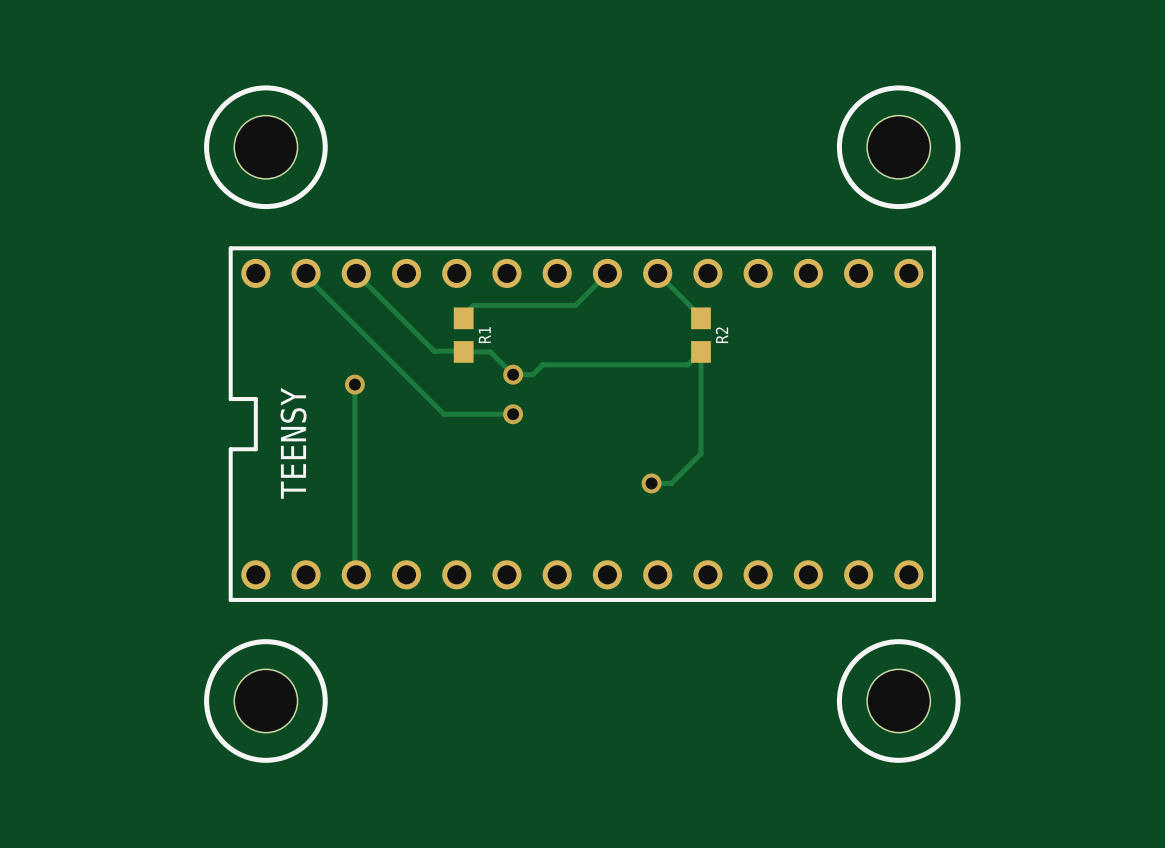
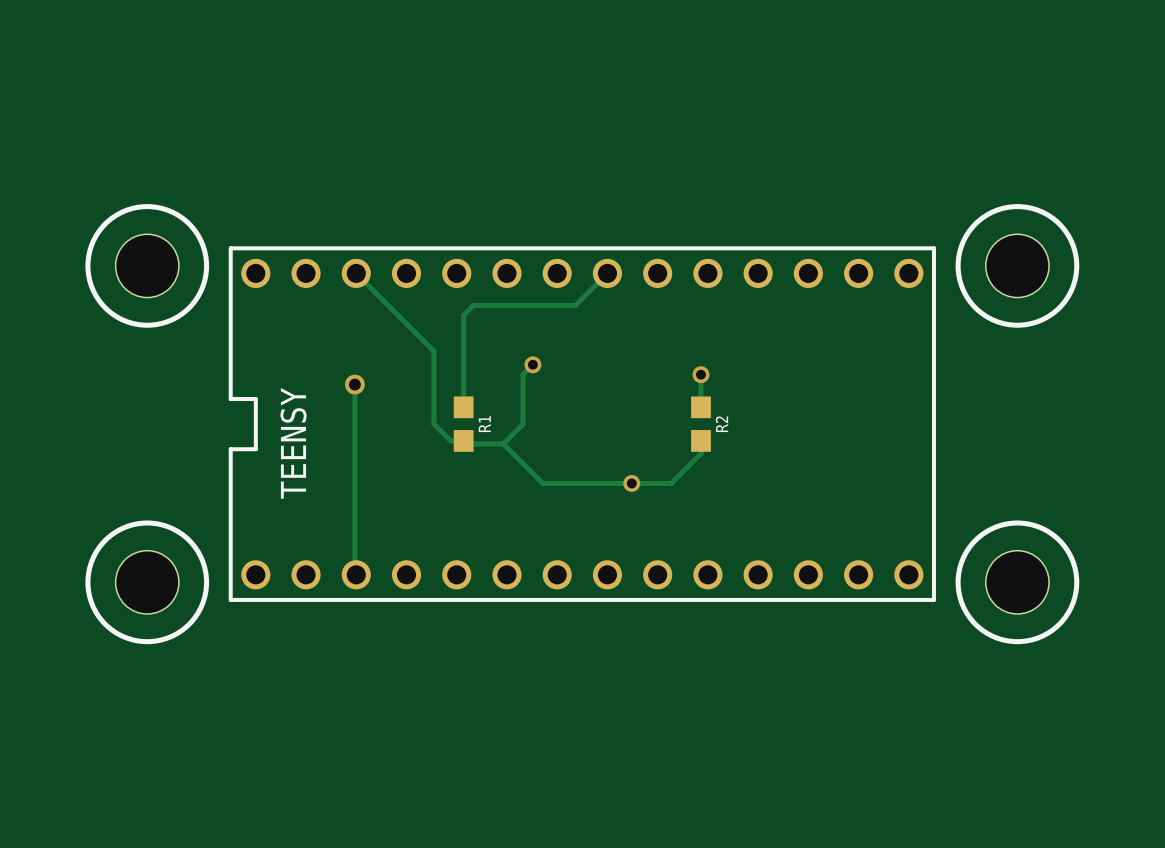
drawing position: (265, 147) -> (147, 265)
hole position: (265, 147) -> (147, 265)
drawing position: (898, 147) -> (1017, 265)
hole position: (898, 147) -> (1017, 265)
track: (306, 273) (306, 276) (443, 414) (513, 414) -> none
track: (657, 273) (700, 318) -> none
track: none -> (463, 318) (463, 407)
R1 position: (463, 335) -> (463, 424)
R2 position: (700, 335) -> (700, 424)
track: (434, 351) (490, 351) (513, 374) (532, 374) (542, 364) (688, 364) (700, 351) (700, 374) -> (434, 351) (434, 424) (450, 440) (463, 440) (466, 443) (503, 443)
track: none -> (532, 364) (523, 374) (523, 424) (503, 443)
via: none -> (532, 364)
via: (513, 374) -> none
via: none -> (700, 374)
track: (700, 407) (700, 440) -> none
via: (513, 414) -> none
track: none -> (503, 443) (542, 483) (651, 483)
via: none -> (631, 483)
via: (651, 483) -> none
drawing position: (265, 700) -> (147, 582)
hole position: (265, 700) -> (147, 582)
drawing position: (898, 700) -> (1017, 582)
hole position: (898, 700) -> (1017, 582)

